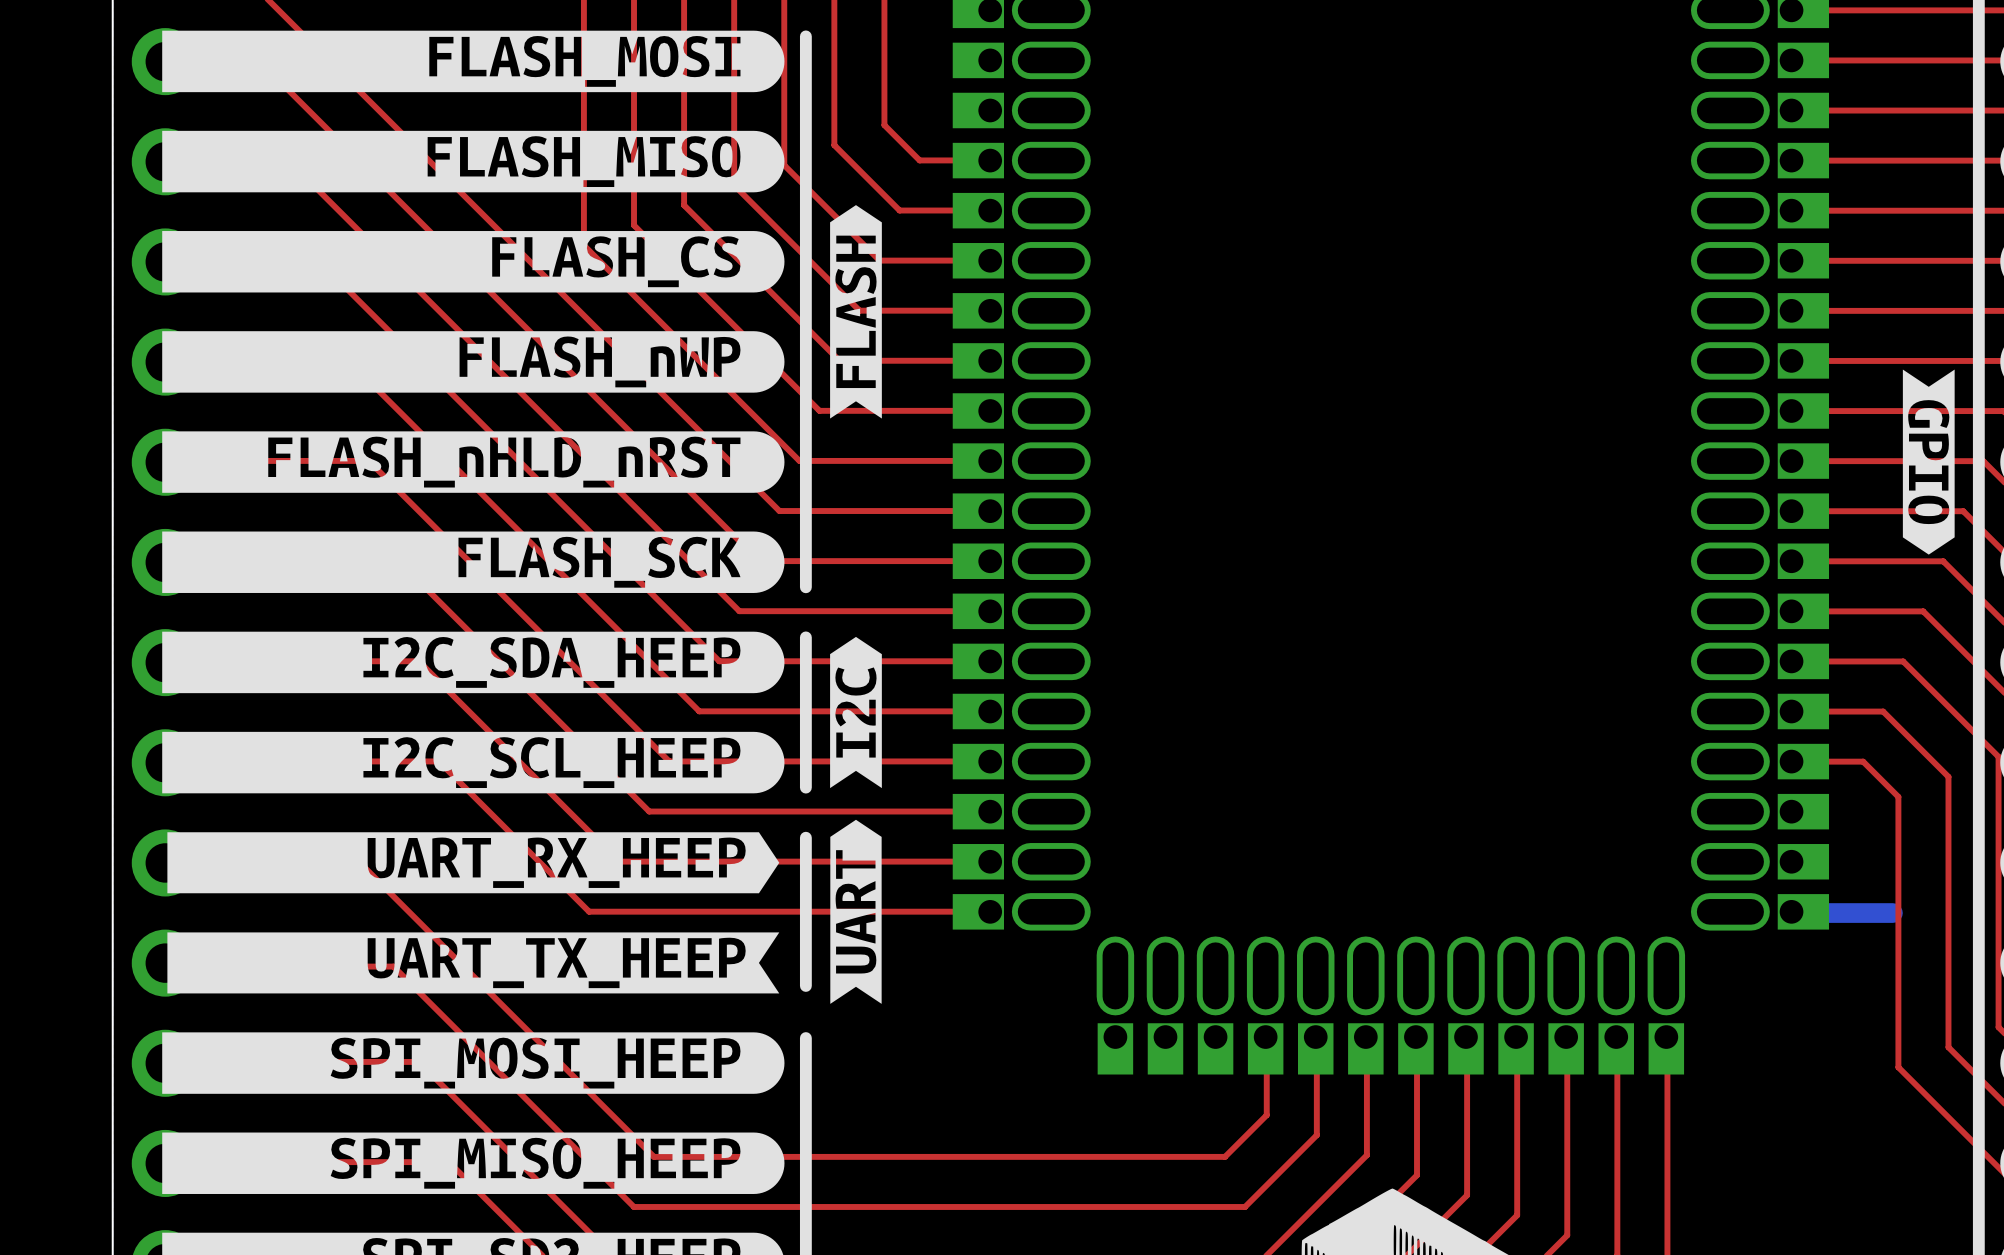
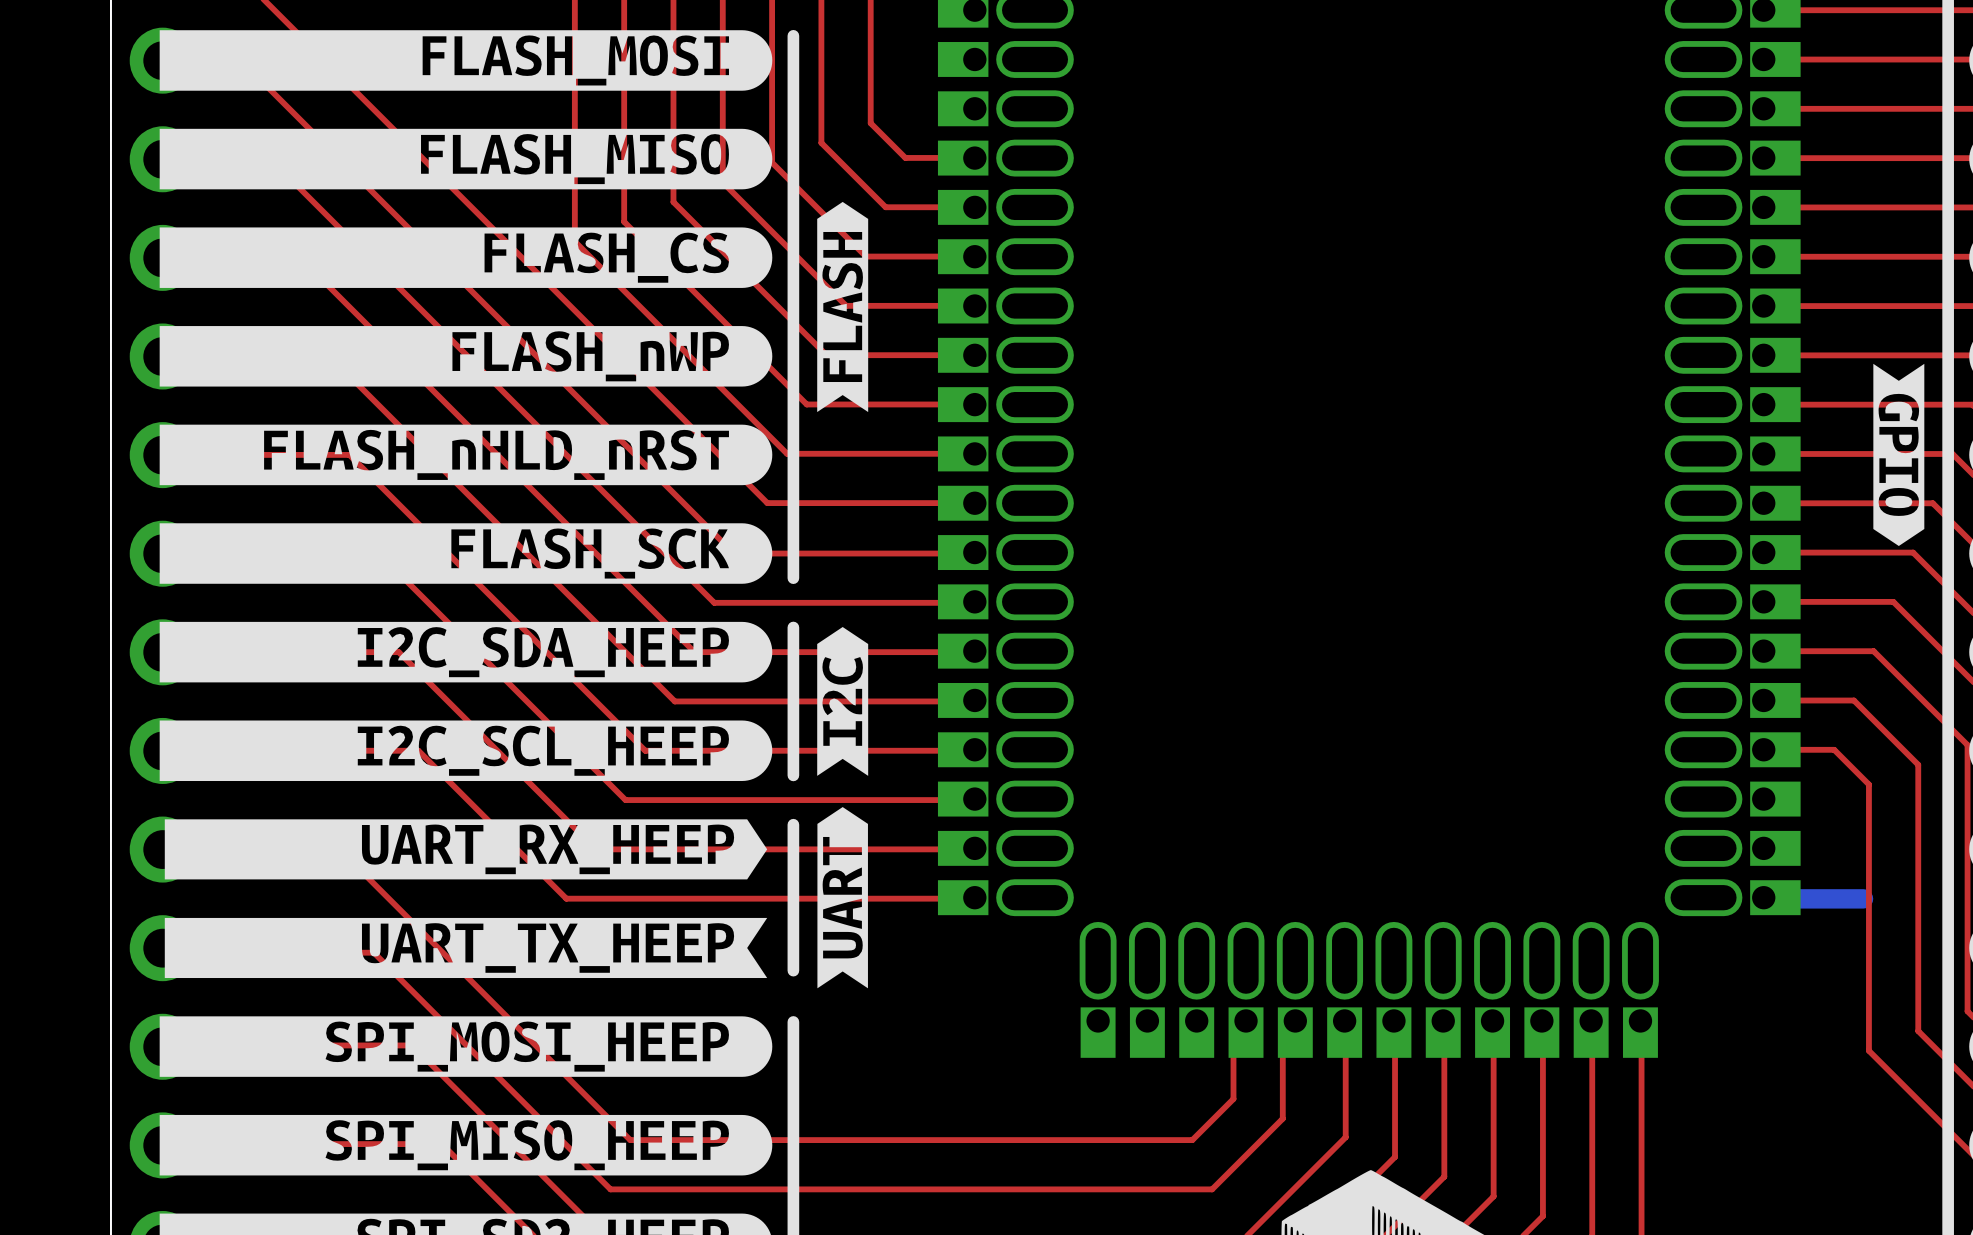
top track: (196, 60) (258, 60) (759, 561) (981, 561) -> (180, 60) (240, 60) (734, 553) (952, 553)
top track: (196, 160) (288, 160) (739, 611) (991, 611) -> (180, 159) (270, 159) (714, 602) (962, 602)
top track: (196, 260) (318, 260) (719, 661) (991, 661) -> (180, 257) (300, 257) (694, 652) (962, 652)
top track: (196, 360) (348, 360) (699, 711) (991, 711) -> (180, 356) (329, 356) (674, 701) (962, 701)
top track: (196, 460) (368, 460) (669, 761) (991, 761) -> (180, 454) (349, 454) (645, 750) (962, 750)
top track: (196, 561) (398, 561) (649, 811) (991, 811) -> (180, 553) (379, 553) (625, 800) (962, 800)
top track: (196, 661) (418, 661) (619, 861) (991, 861) -> (180, 652) (398, 652) (595, 849) (962, 849)
top track: (196, 761) (438, 761) (589, 911) (991, 911) -> (180, 750) (418, 750) (566, 898) (962, 898)
top track: (196, 861) (358, 861) (654, 1156) (1225, 1156) (1266, 1115) (1266, 1036) -> (180, 849) (339, 849) (630, 1140) (1192, 1140) (1233, 1098) (1233, 1021)
top track: (196, 961) (201, 966) (393, 966) (634, 1206) (1245, 1206) (1316, 1135) (1316, 1036) -> (180, 947) (184, 952) (373, 952) (610, 1189) (1212, 1189) (1282, 1118) (1282, 1021)

